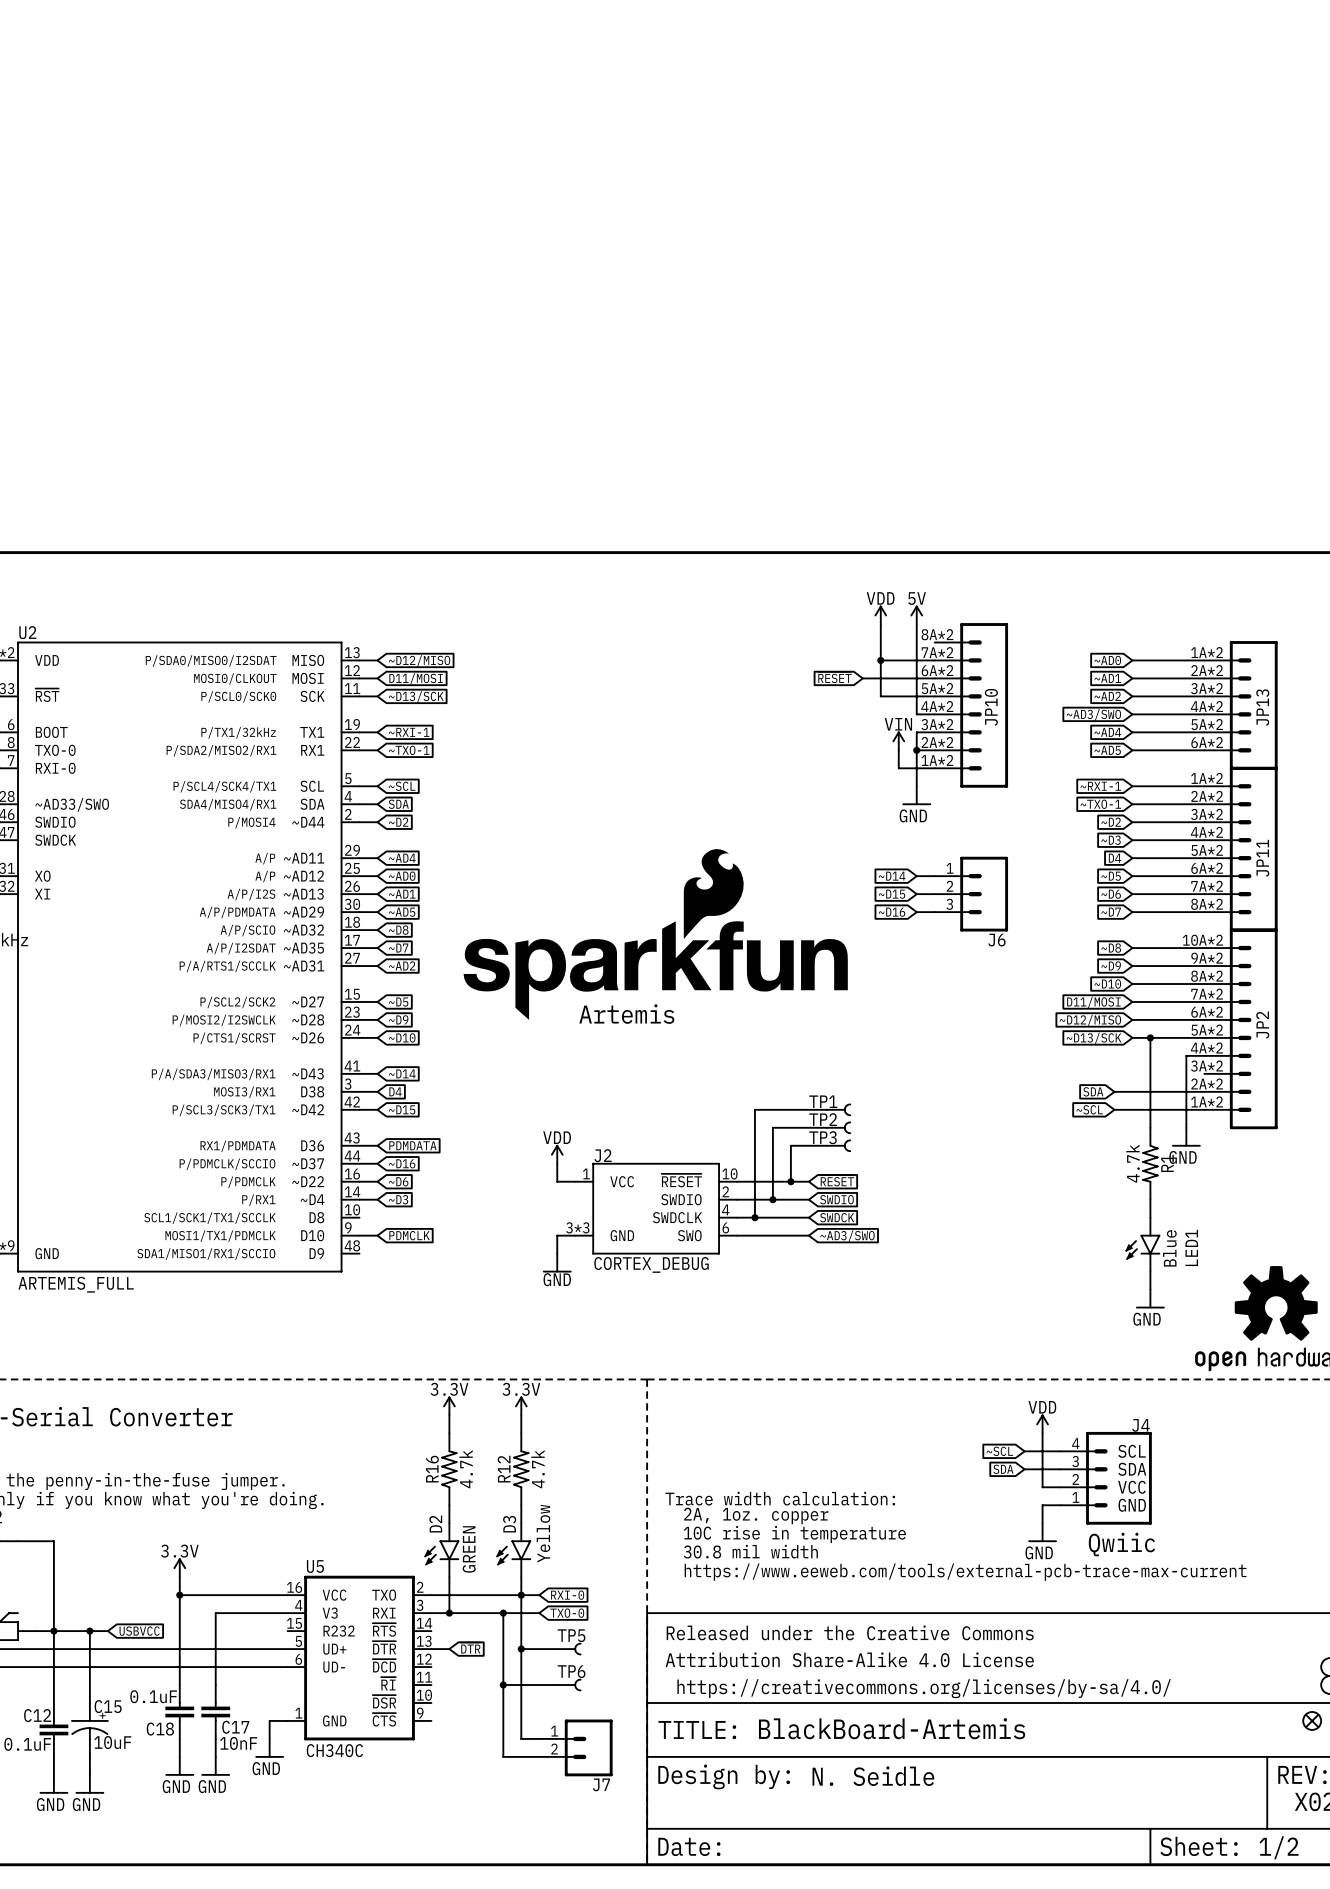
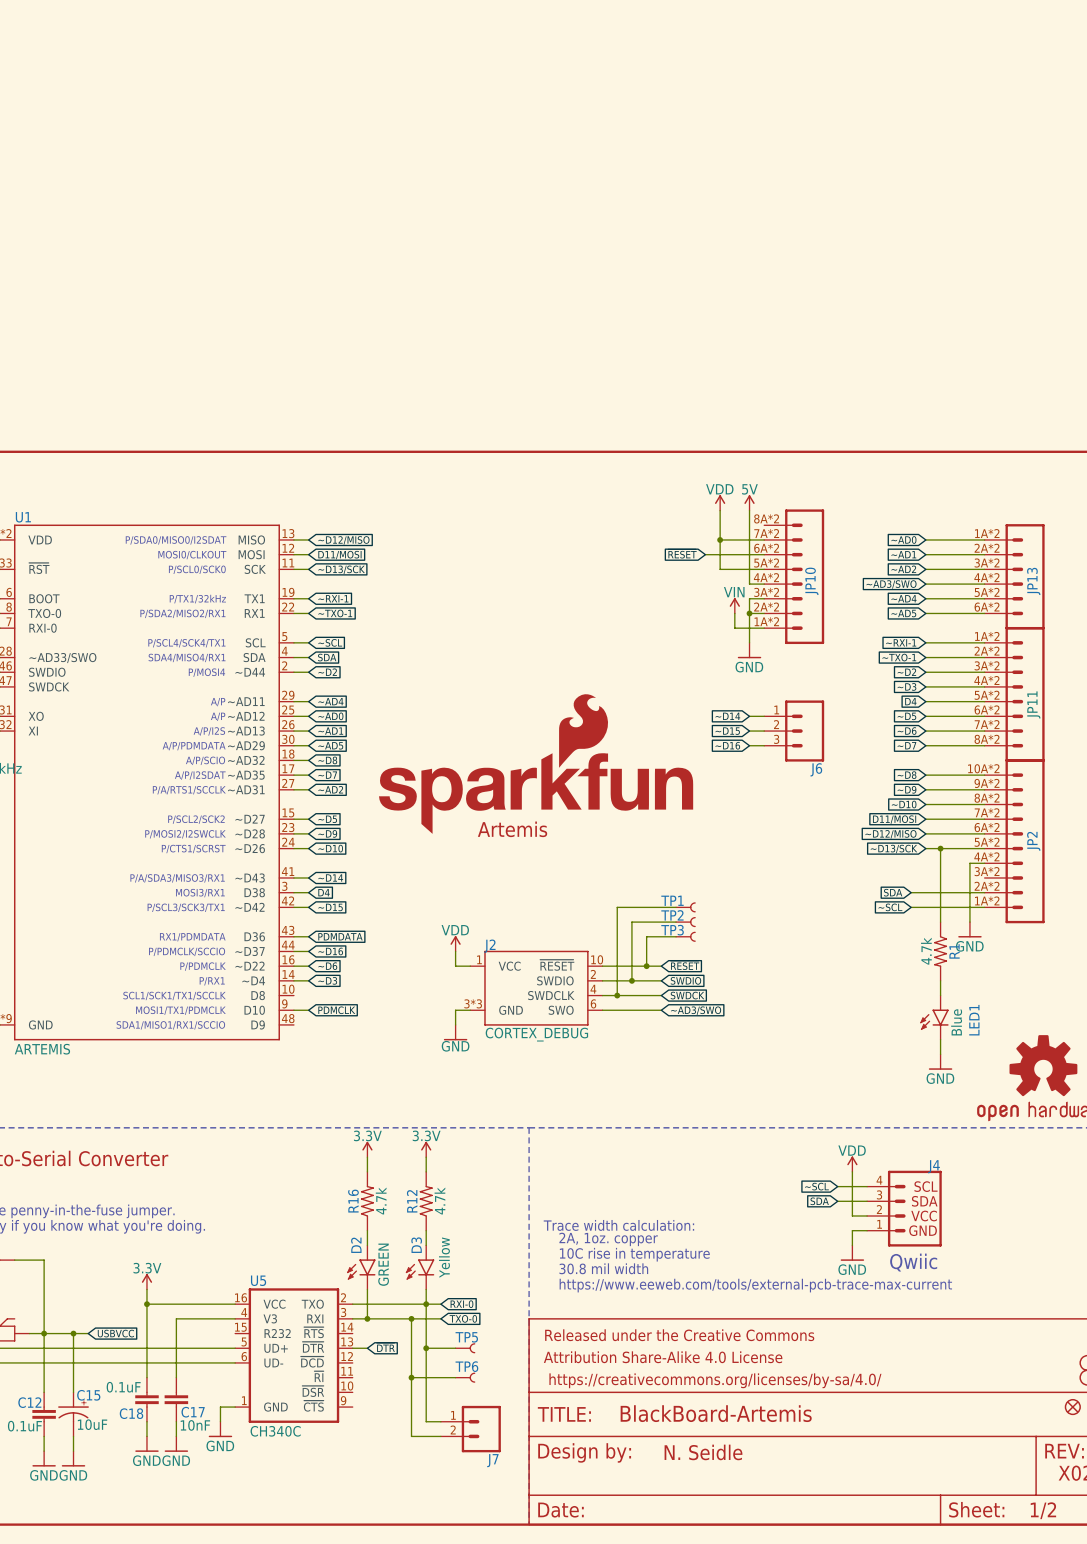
U2 name: U2 (27, 632) -> U1 (23, 517)
U2 value: ARTEMIS_FULL (76, 1284) -> ARTEMIS (42, 1049)

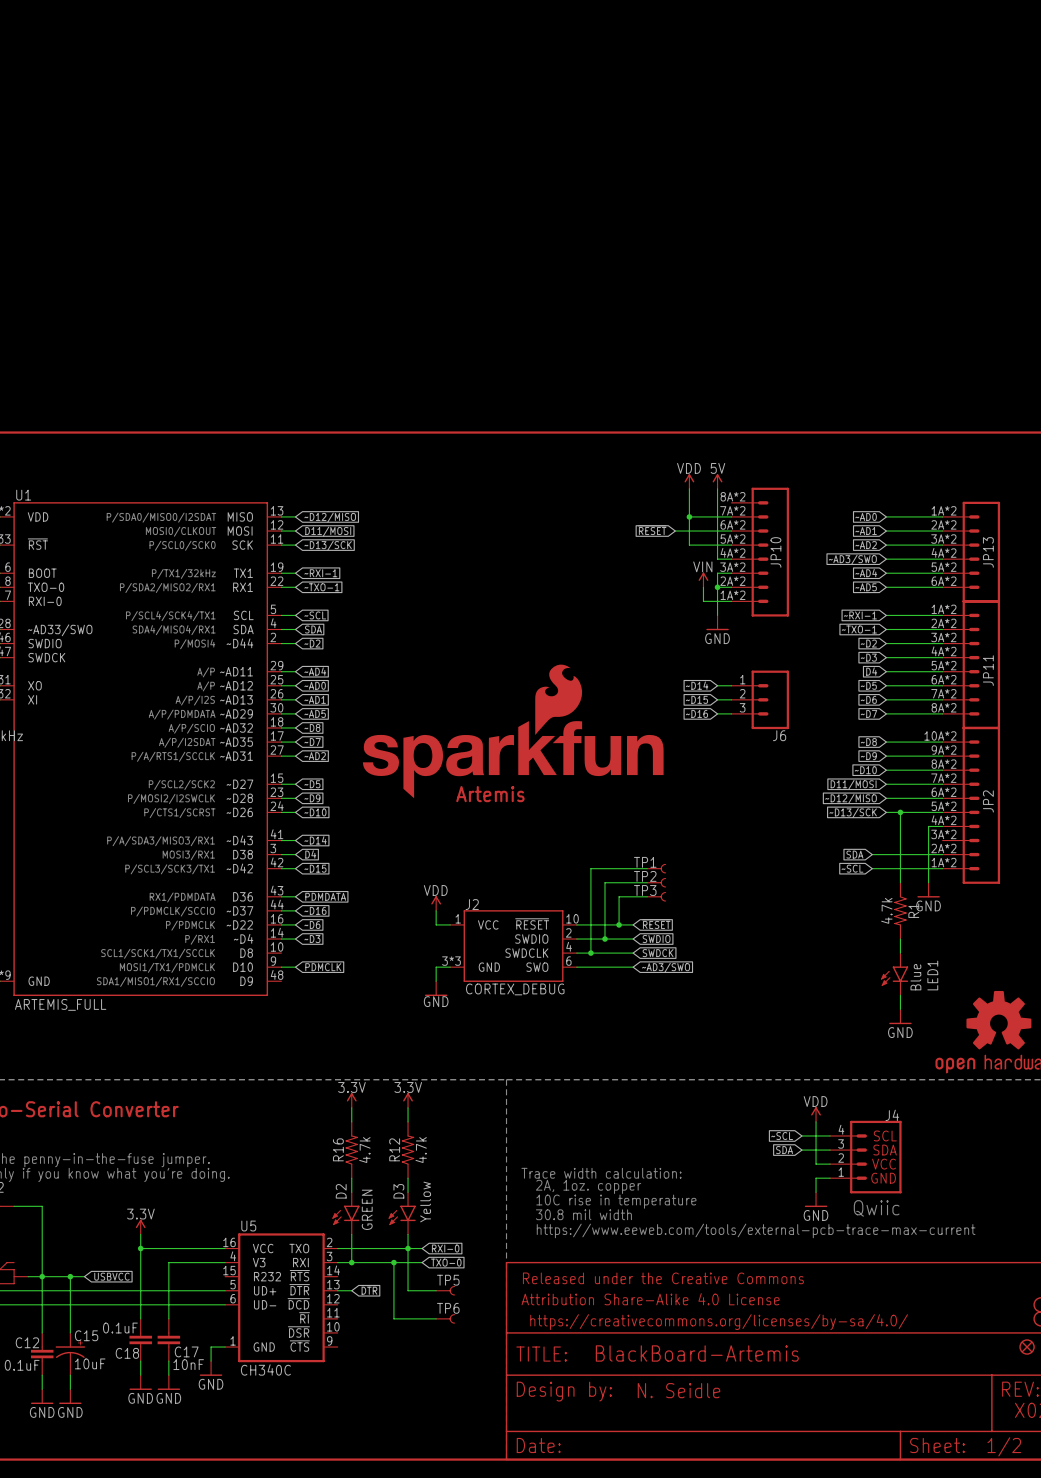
U1 value: ARTEMIS (42, 1049) -> ARTEMIS_FULL (60, 1004)
wire: (426, 1348) (426, 1421) (440, 1421) -> none
junction: (426, 1348) -> none
wire: (411, 1377) (411, 1436) (440, 1436) -> none
junction: (411, 1377) -> none
J7: (470, 1429) -> none

